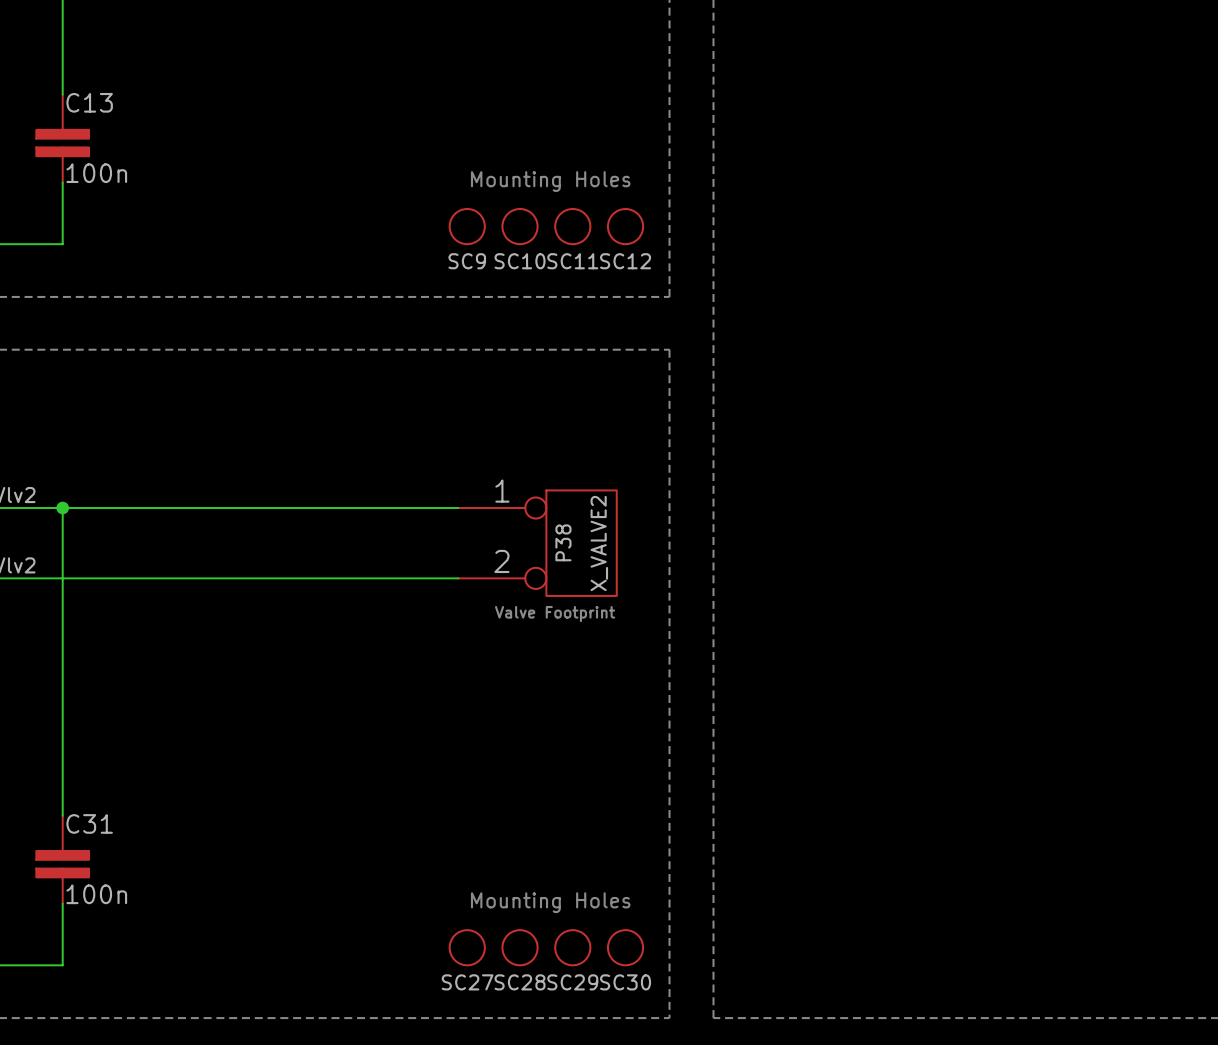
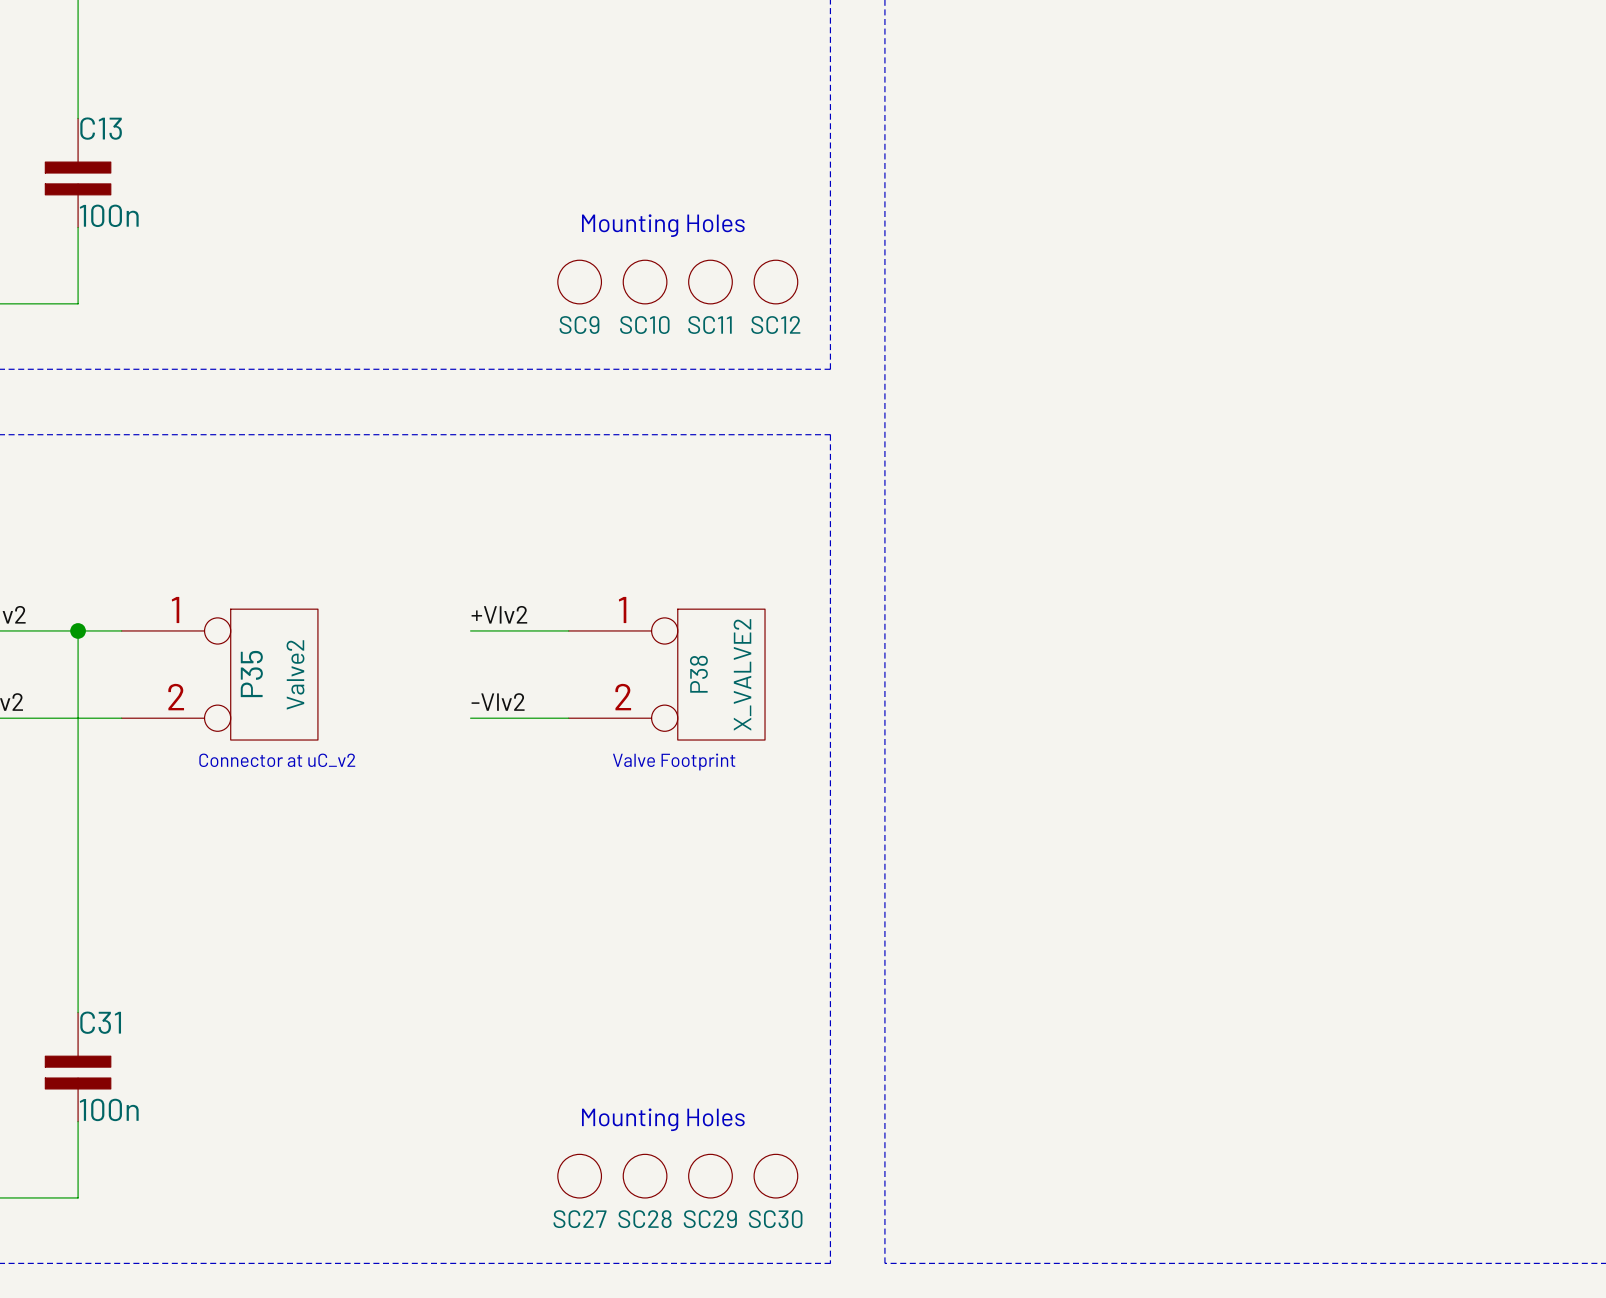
label: none -> +Vlv2 (499, 614)
wire: (97, 508) (379, 508) -> none
P35: none -> Valve2 (219, 674)
label: none -> -Vlv2 (498, 702)
wire: (97, 578) (379, 578) -> none
text: none -> Connector at uC_v2 (277, 760)

